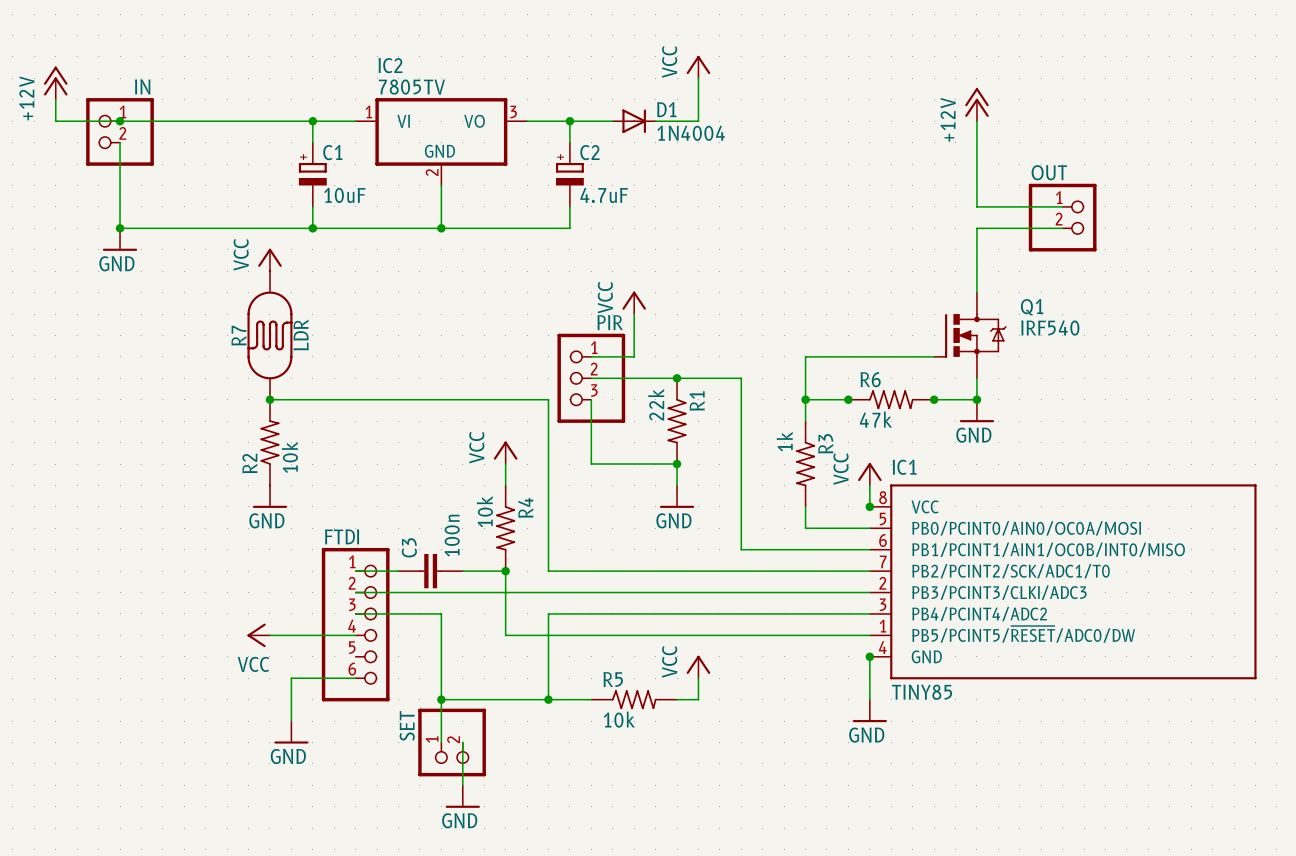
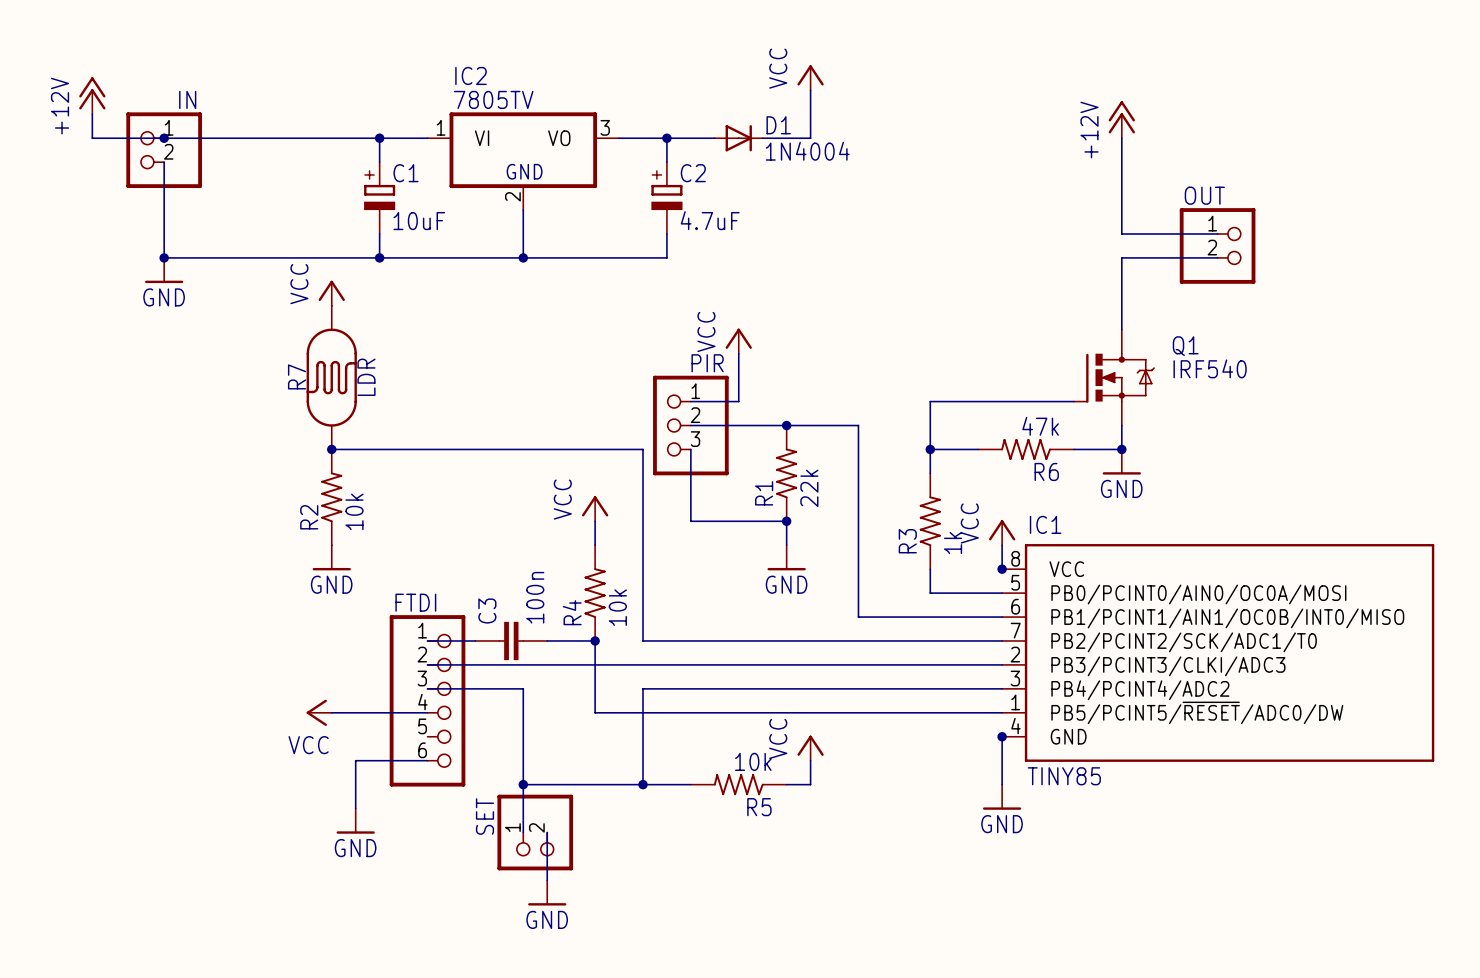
junction: (848, 399) -> none
R6 rotation: 0° (891, 399) -> 180° (1026, 449)
junction: (934, 399) -> none
R1 rotation: 0° (677, 421) -> 180° (786, 473)
R3 rotation: 0° (805, 464) -> 180° (930, 521)
R4 rotation: 0° (505, 528) -> 180° (595, 593)
R5 rotation: 0° (634, 699) -> 180° (738, 784)

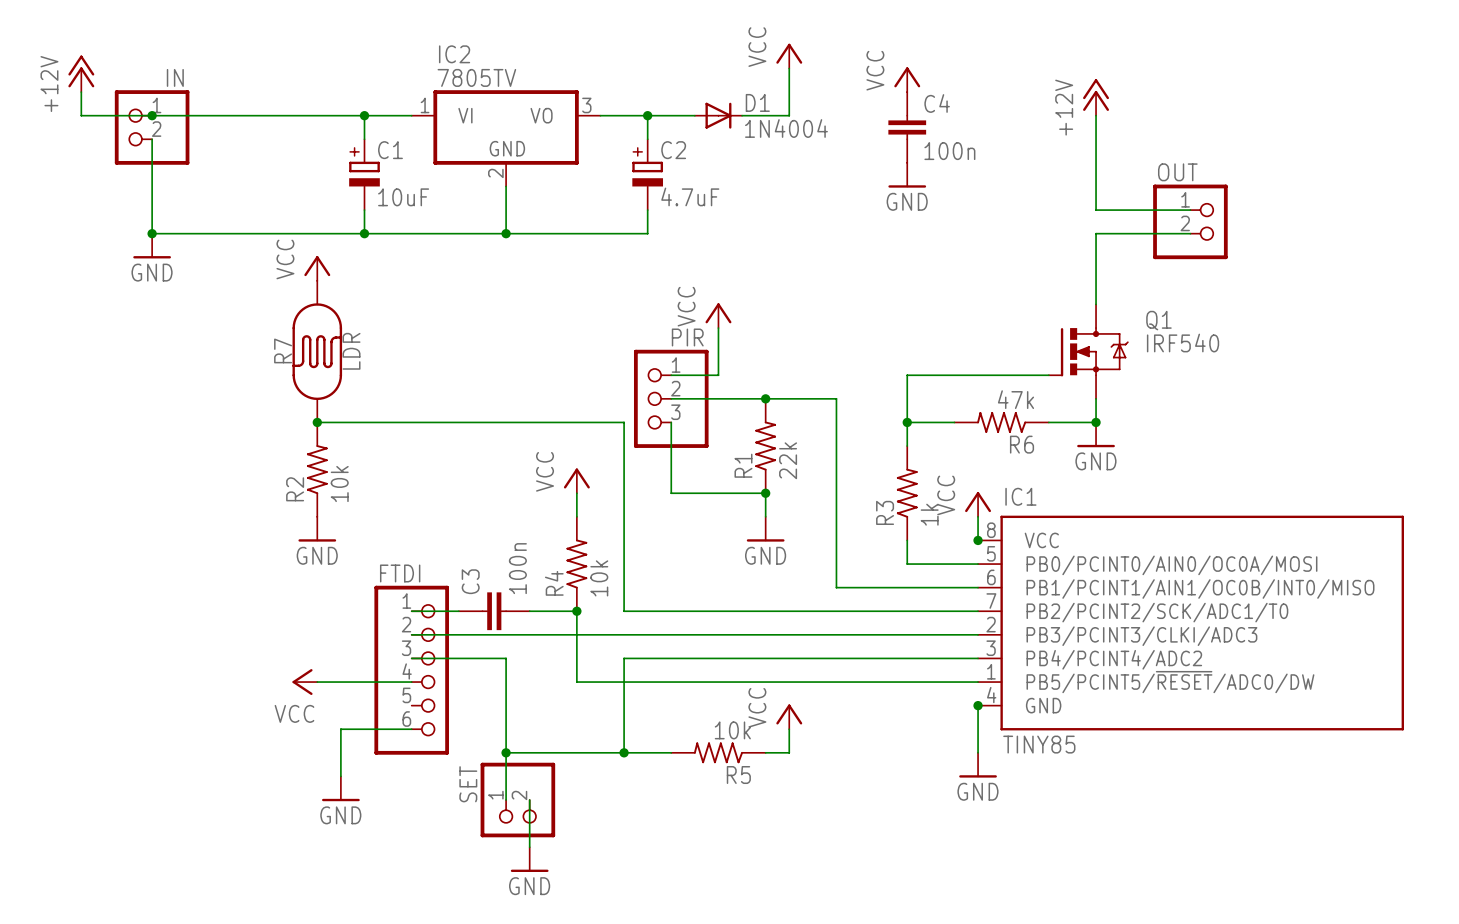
power symbol: none -> VCC (907, 79)
C4: none -> 100n (907, 127)
power symbol: none -> GND (907, 175)

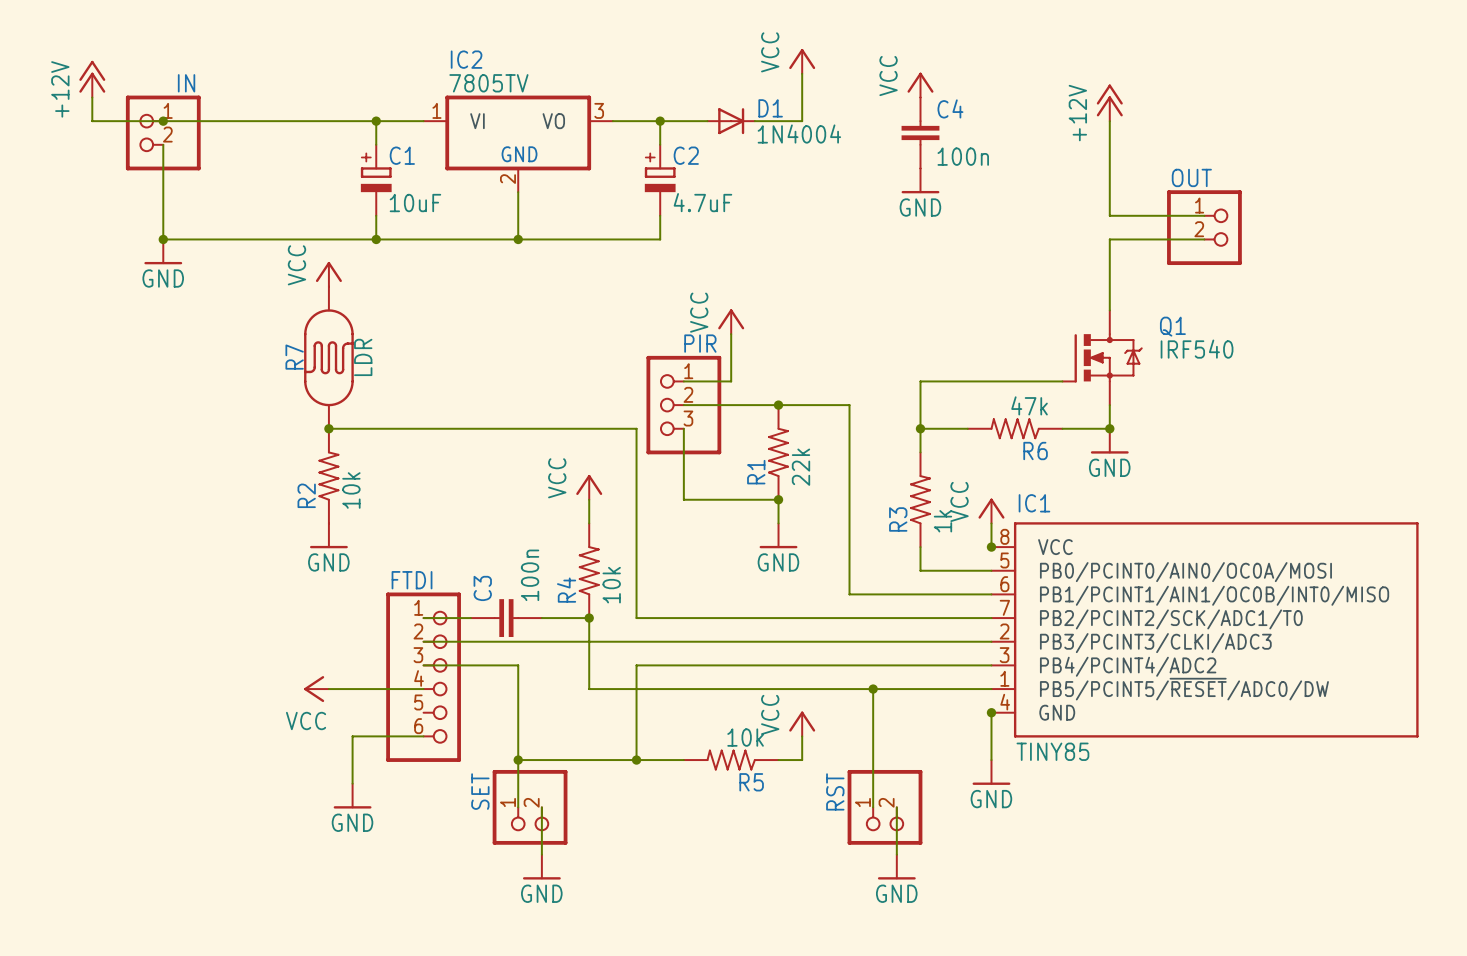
wire: none -> (873, 689) (873, 807)
junction: none -> (873, 689)
RST: none -> (885, 807)
wire: none -> (896, 807) (896, 854)
power symbol: none -> GND (896, 867)

